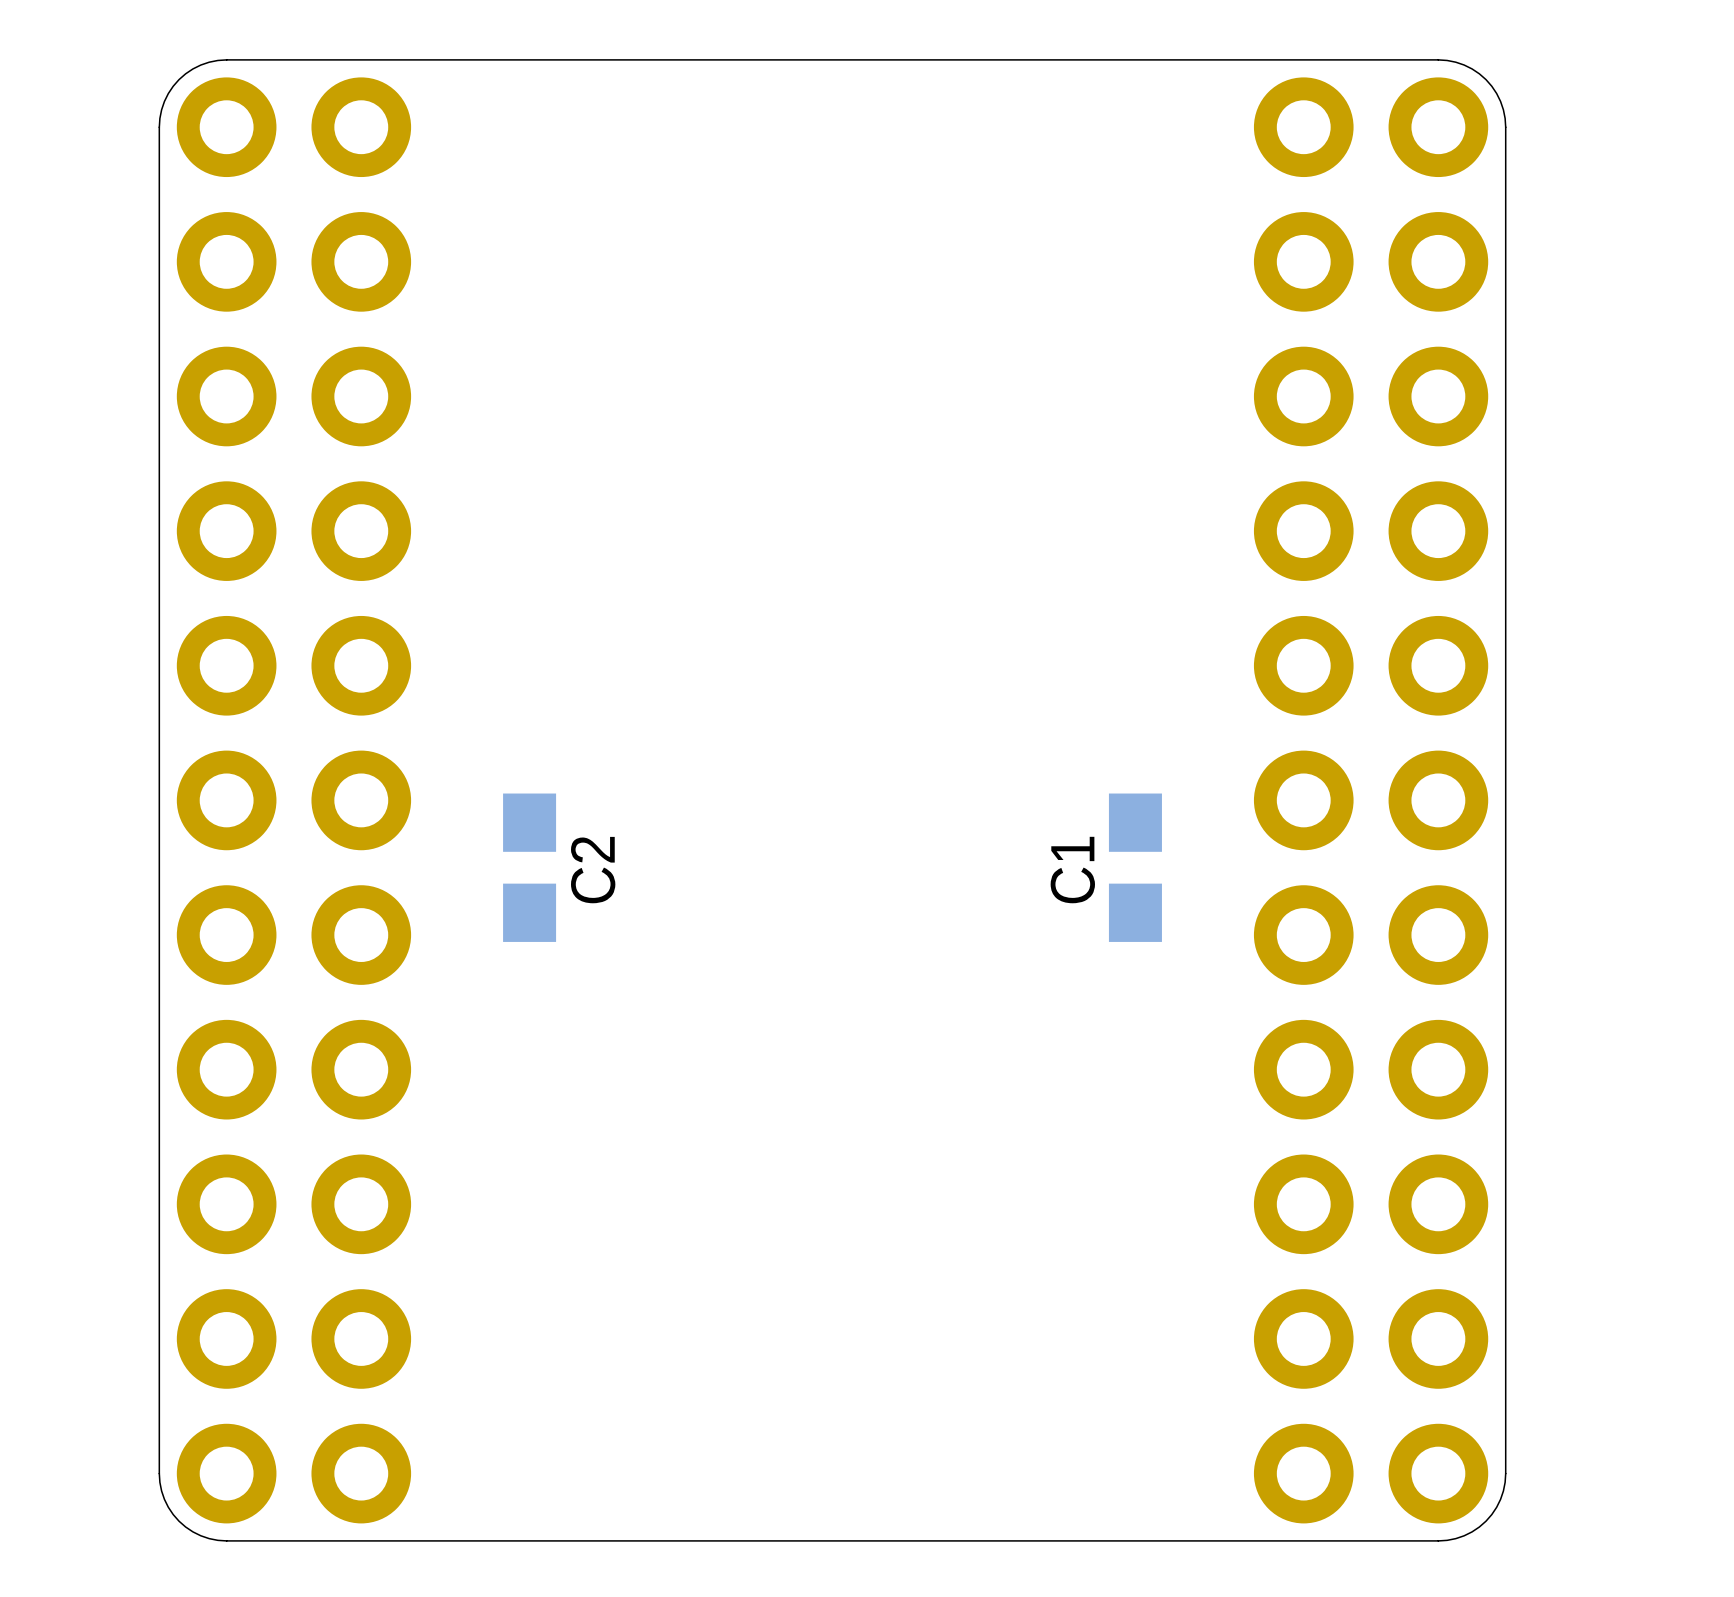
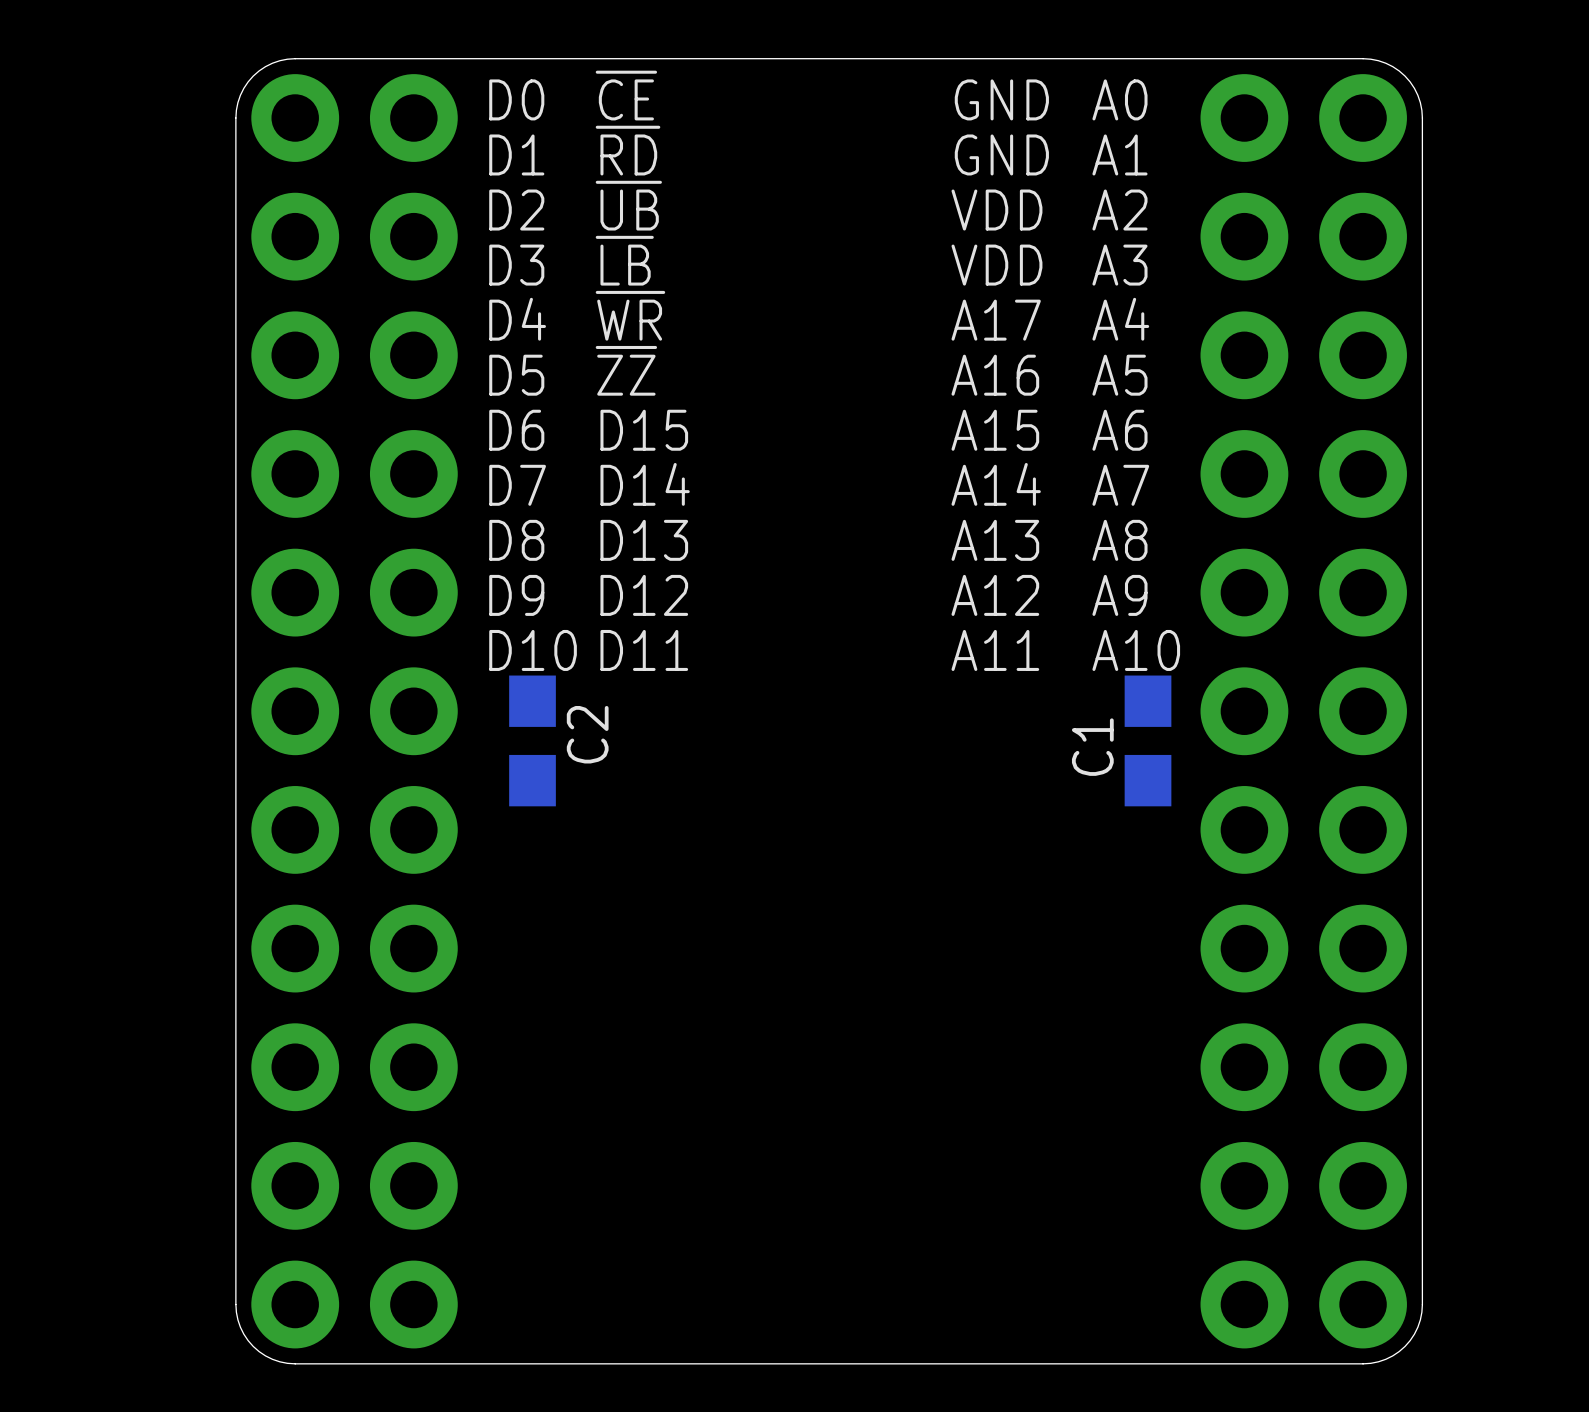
text: none -> ~{CE} (626, 95)
text: none -> D0 (516, 99)
text: none -> GND (1001, 99)
text: none -> A0 (1119, 99)
text: none -> ~{RD} (628, 150)
text: none -> D1 (516, 154)
text: none -> GND (1001, 154)
text: none -> A1 (1119, 154)
text: none -> ~{UB} (628, 205)
text: none -> D2 (516, 210)
text: none -> VDD (996, 210)
text: none -> A2 (1119, 210)
text: none -> ~{LB} (624, 260)
text: none -> D3 (516, 265)
text: none -> VDD (996, 265)
text: none -> A3 (1119, 265)
text: none -> ~{WR} (630, 315)
text: none -> D4 (517, 319)
text: none -> A17 (996, 320)
text: none -> A4 (1120, 319)
text: none -> ~{ZZ} (626, 370)
text: none -> D5 (516, 375)
text: none -> A16 (995, 375)
text: none -> A5 (1119, 375)
text: none -> D6 (516, 430)
text: none -> D15 (644, 430)
text: none -> A15 (995, 430)
text: none -> A6 (1119, 430)
text: none -> D7 (517, 485)
text: none -> D14 (645, 484)
text: none -> A14 (996, 484)
text: none -> A7 (1120, 485)
text: none -> D8 (516, 540)
text: none -> D13 (644, 540)
text: none -> A13 (995, 540)
text: none -> A8 (1119, 540)
text: none -> D9 (516, 595)
text: none -> D12 (644, 595)
text: none -> A12 (995, 595)
text: none -> A9 (1119, 595)
text: none -> D10 (533, 650)
text: none -> D11 (644, 650)
text: none -> A11 (995, 650)
text: none -> A10 (1136, 650)
C2 position: (529, 867) -> (532, 740)
C1 position: (1135, 867) -> (1148, 740)
C2 name position: C2 (593, 870) -> C2 (587, 734)

